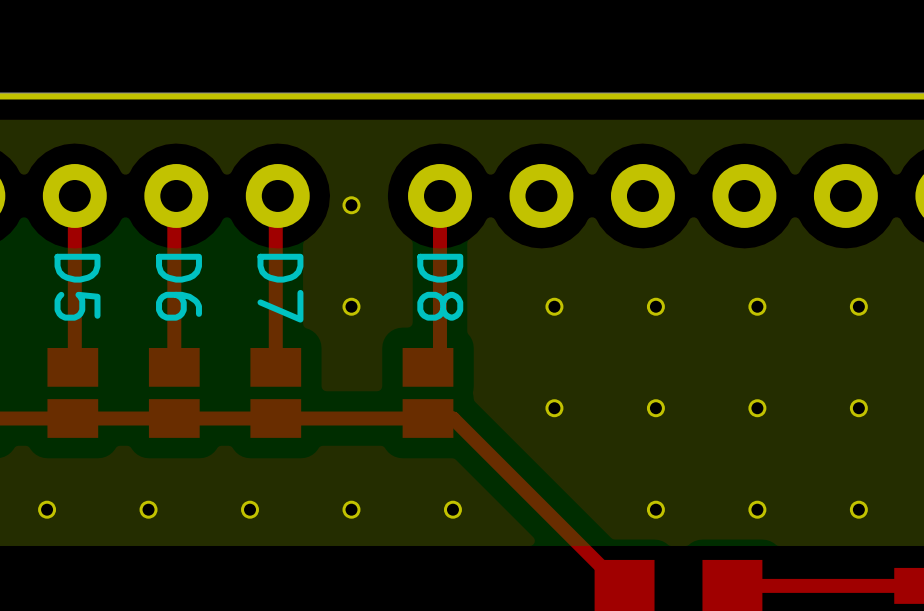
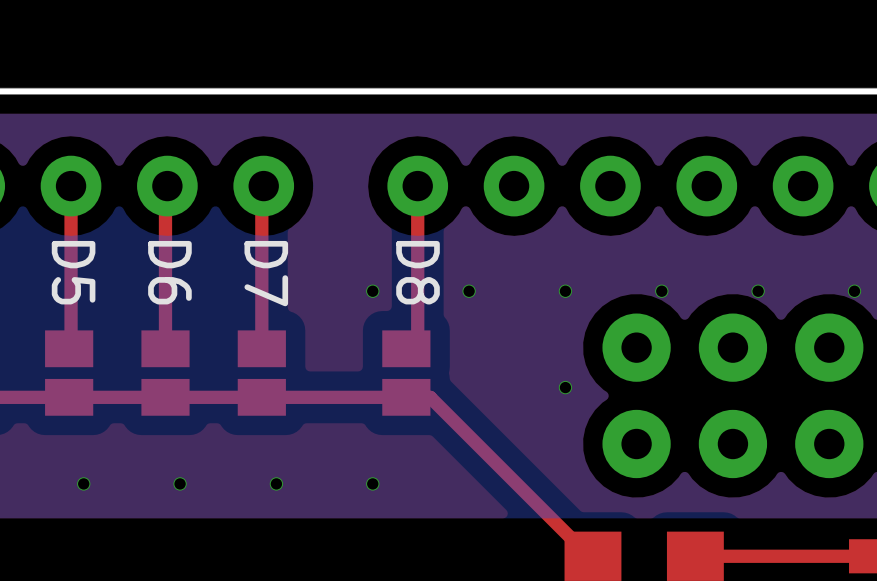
part: (351, 205) -> none
part: (351, 306) -> none
part: none -> (372, 291)
part: none -> (469, 291)
part: (554, 306) -> none
part: none -> (565, 291)
part: (655, 306) -> none
part: none -> (661, 291)
part: (757, 306) -> none
part: none -> (758, 291)
part: (858, 306) -> none
part: none -> (854, 291)
part: none -> (636, 347)
part: none -> (732, 347)
part: none -> (829, 347)
part: (554, 408) -> none
part: none -> (565, 387)
part: (655, 408) -> none
part: (757, 408) -> none
part: (858, 408) -> none
part: none -> (636, 444)
part: none -> (732, 444)
part: none -> (829, 444)
part: (47, 509) -> none
part: none -> (83, 483)
part: (148, 509) -> none
part: none -> (180, 483)
part: (250, 509) -> none
part: none -> (276, 483)
part: (351, 509) -> none
part: none -> (372, 483)
part: (452, 509) -> none
part: (655, 509) -> none
part: (757, 509) -> none
part: (858, 509) -> none

